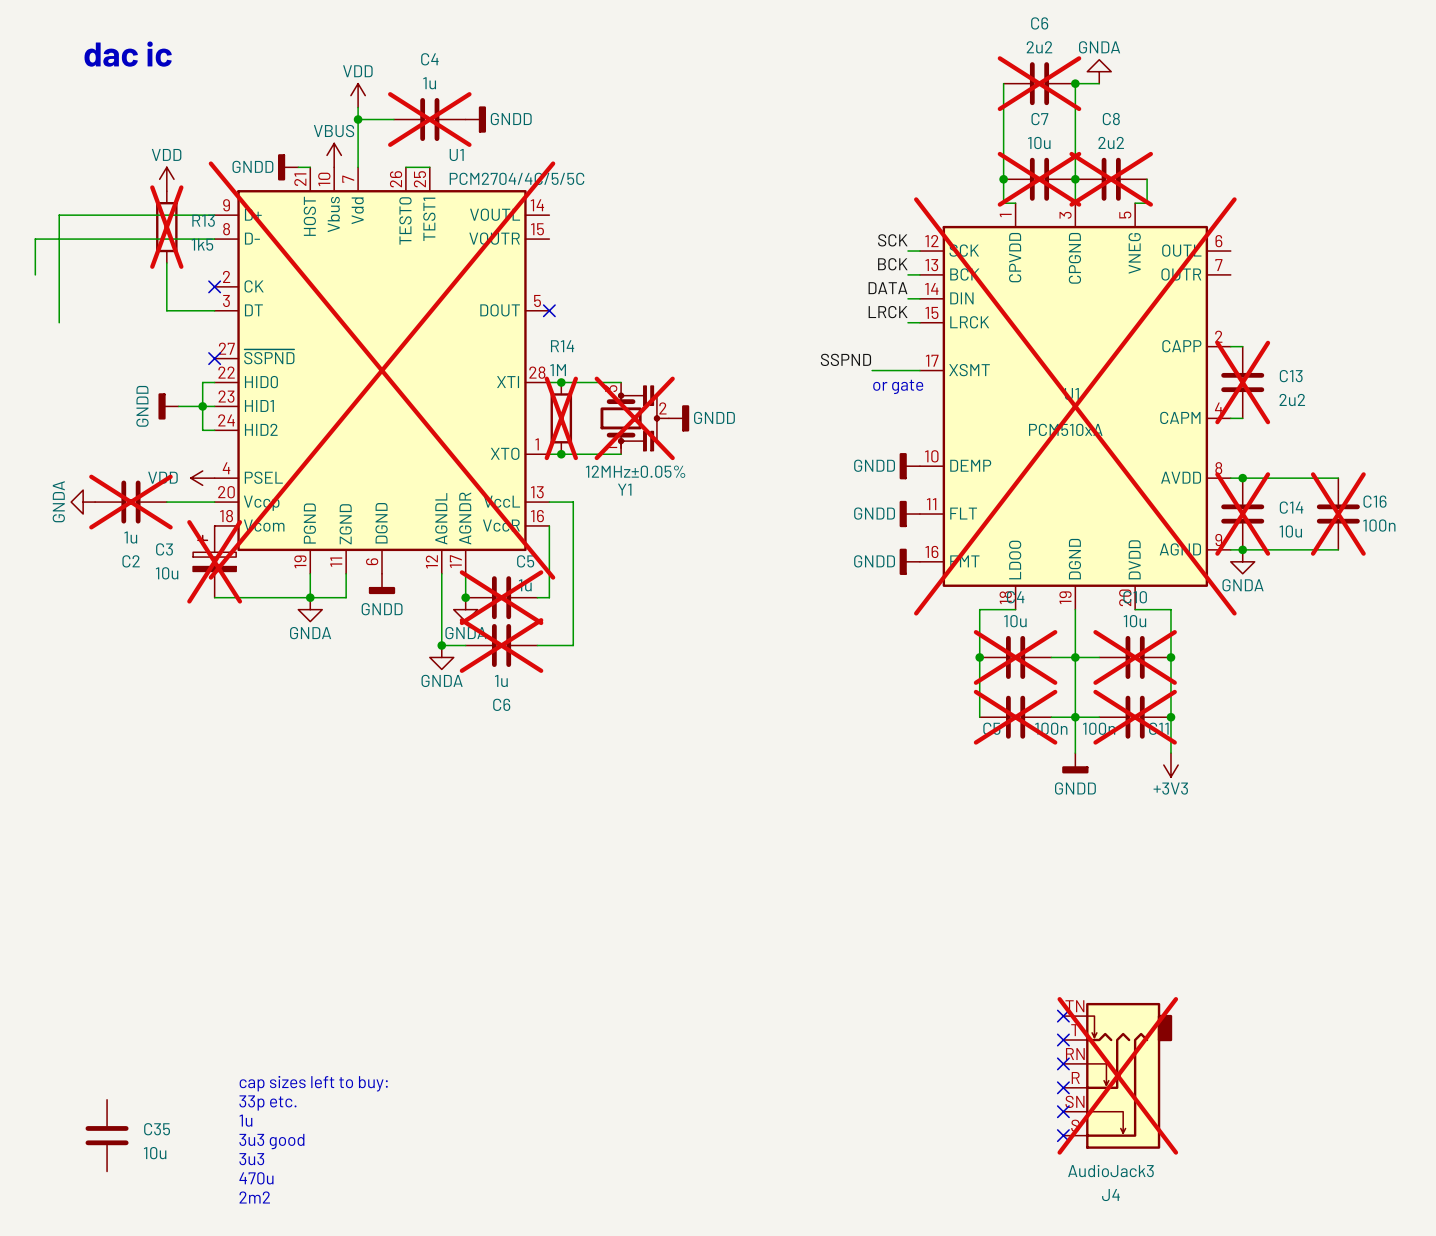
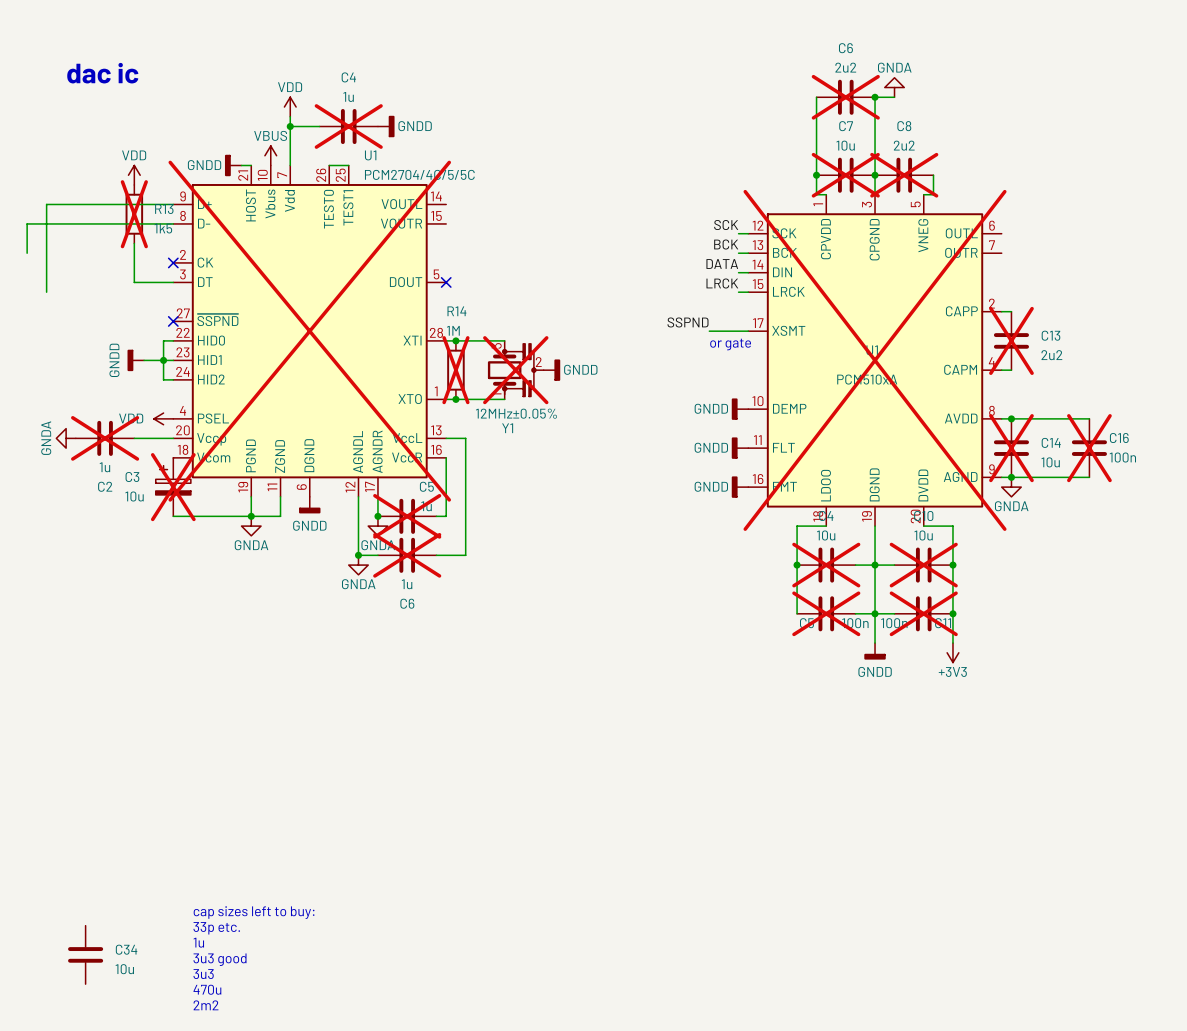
no-connect mark: (1063, 1016) -> none
no-connect mark: (1063, 1040) -> none
no-connect mark: (1063, 1063) -> none
J4: AudioJack3 (1117, 1075) -> none
no-connect mark: (1063, 1087) -> none
no-connect mark: (1063, 1111) -> none
C35 name: C35 (157, 1129) -> C34 (126, 949)
no-connect mark: (1063, 1135) -> none

